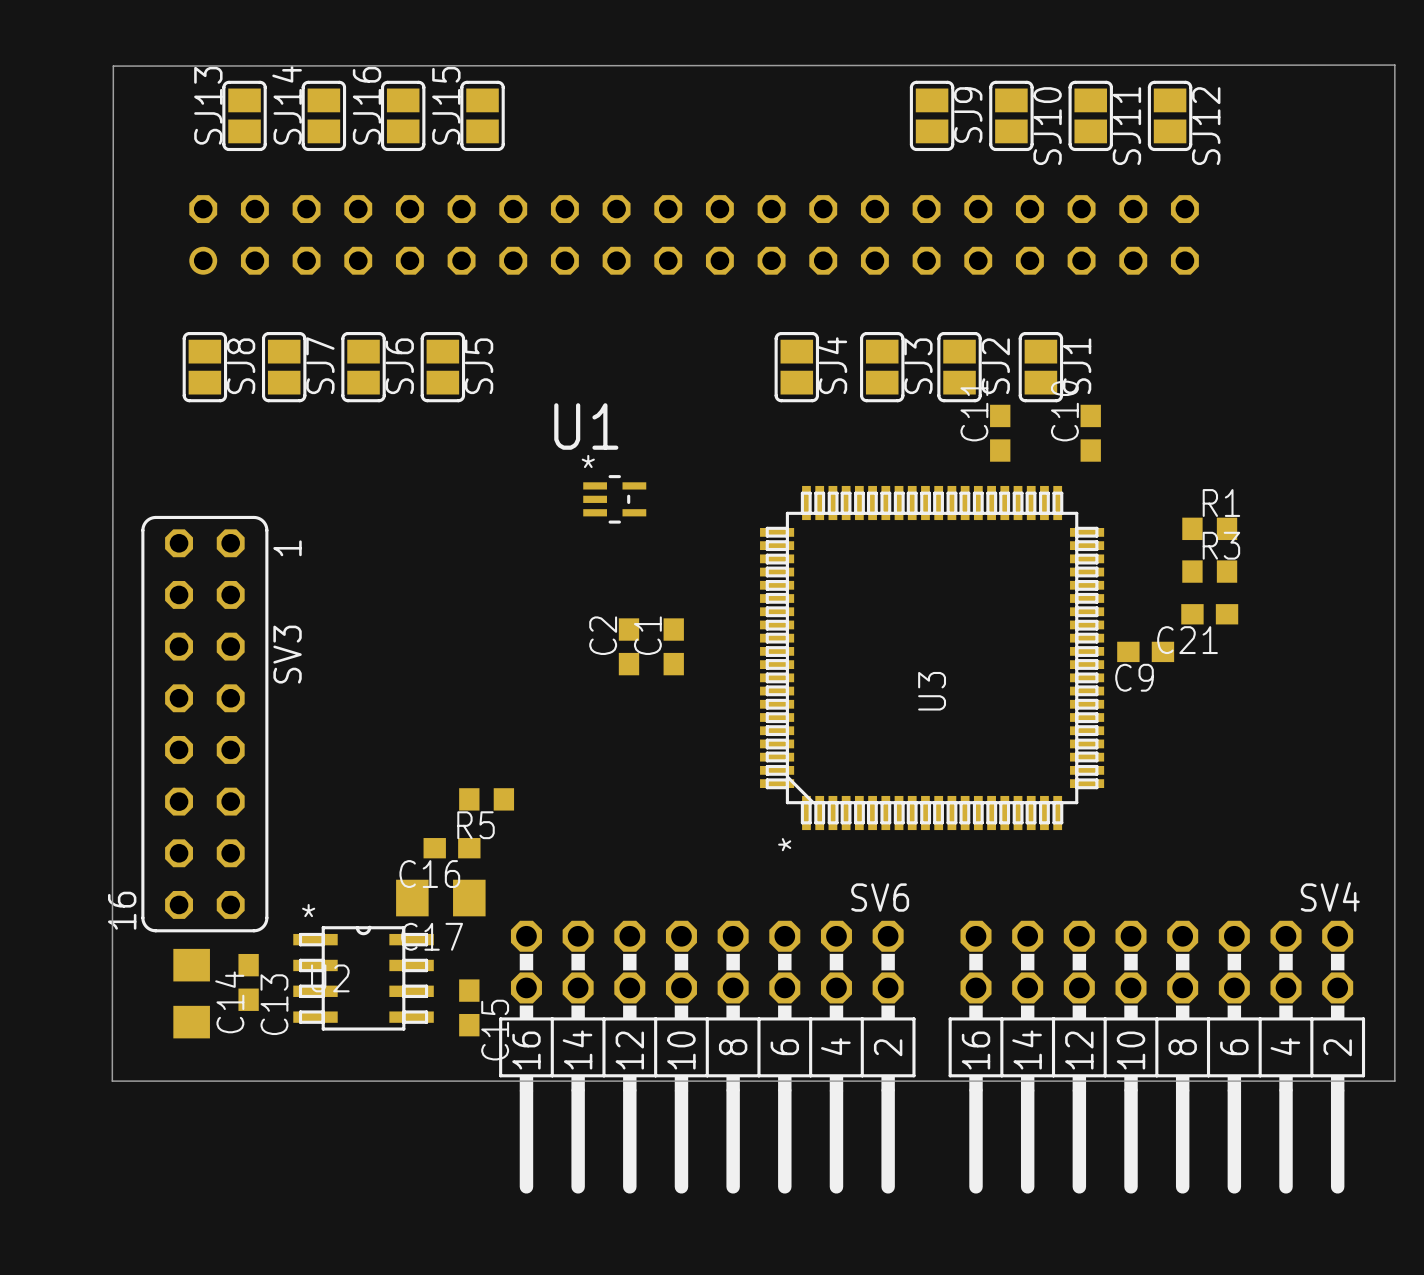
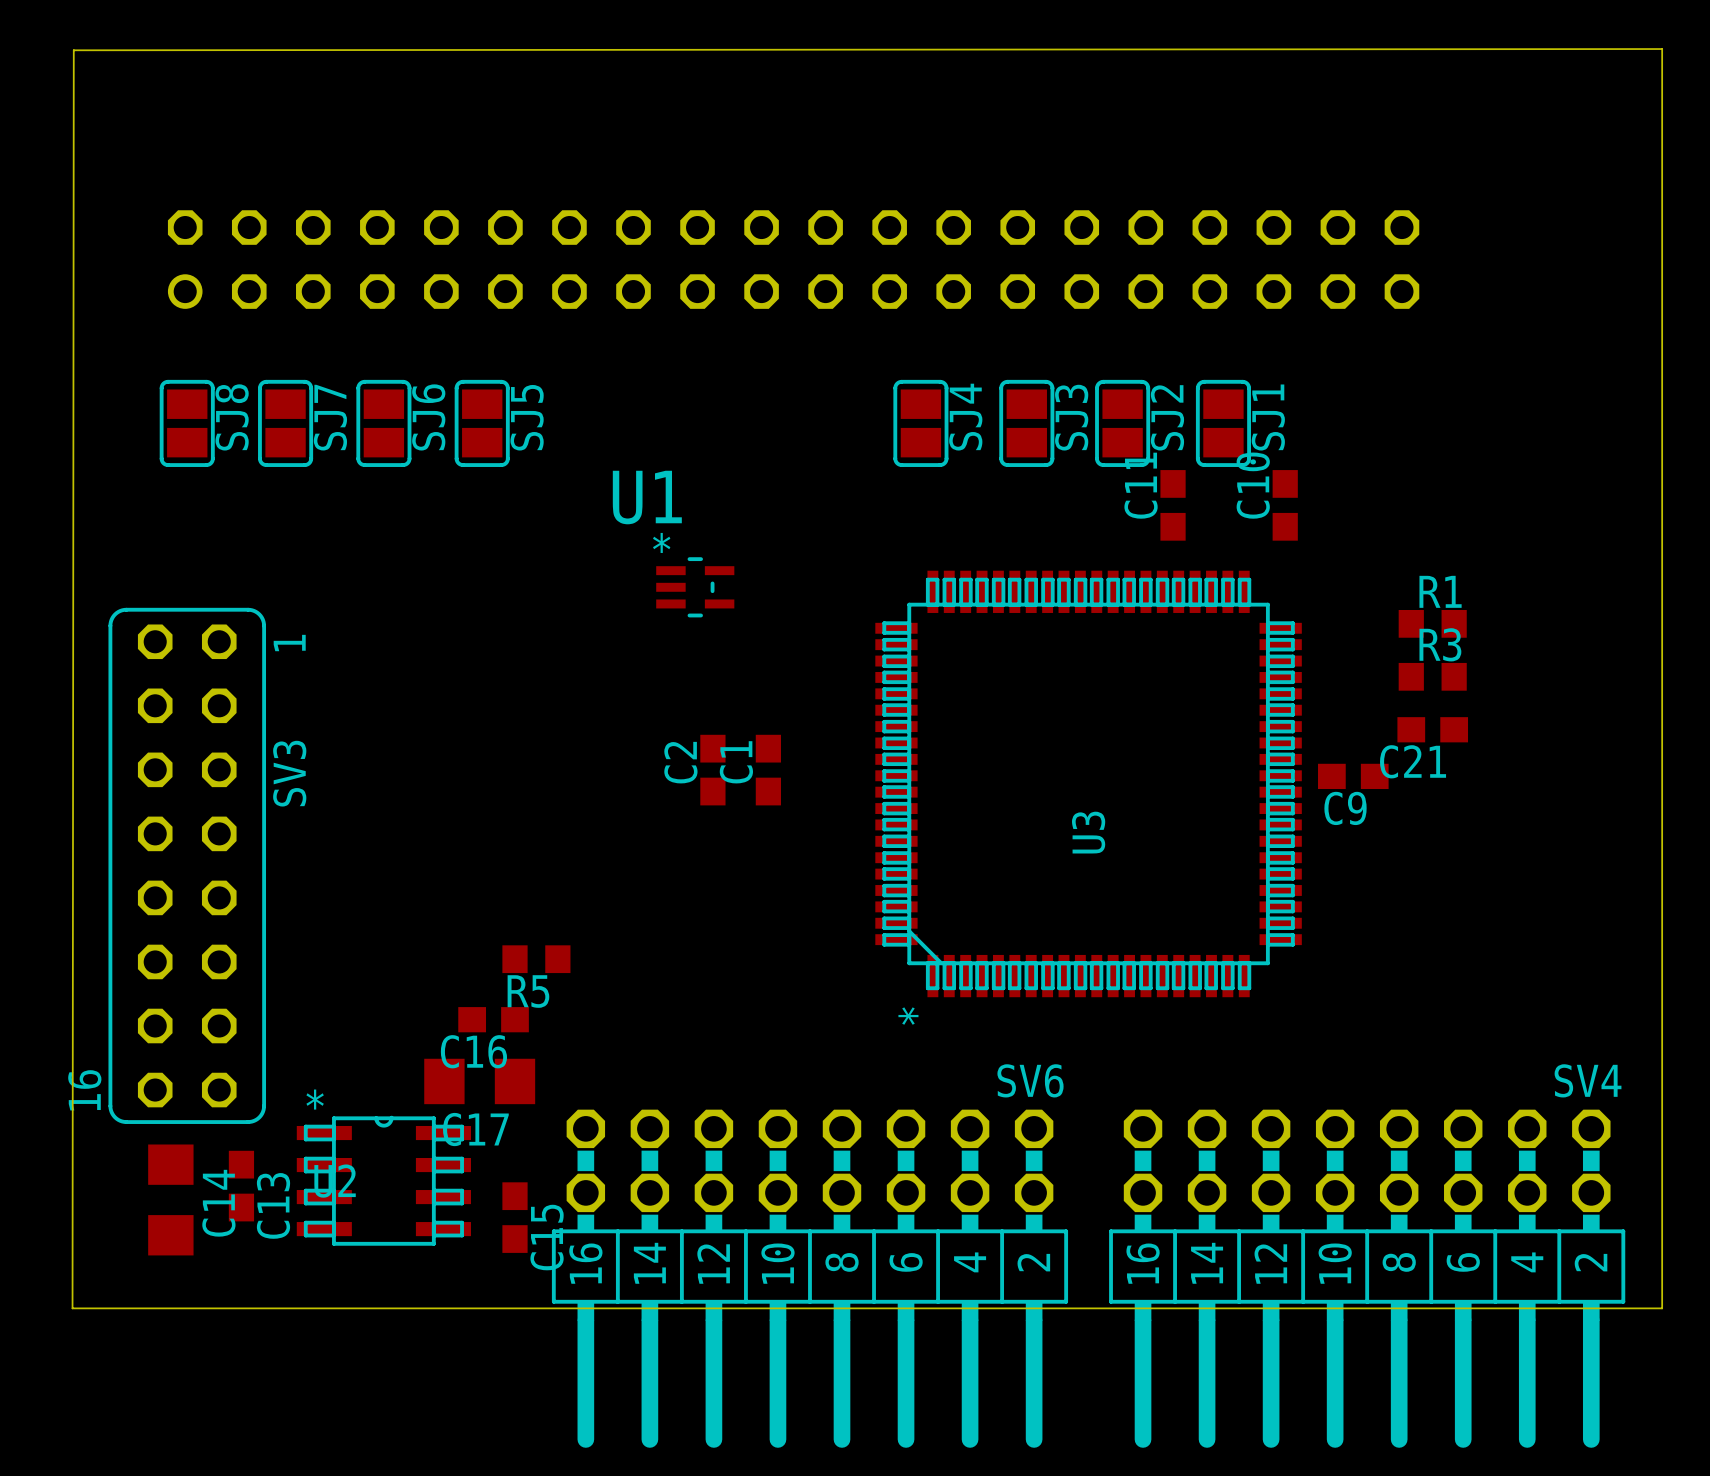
SJ13: (244, 115) -> none
SJ14: (323, 115) -> none
SJ16: (403, 115) -> none
SJ15: (482, 115) -> none
SJ9: (932, 115) -> none
SJ10: (1011, 115) -> none
SJ11: (1090, 115) -> none
SJ12: (1170, 115) -> none

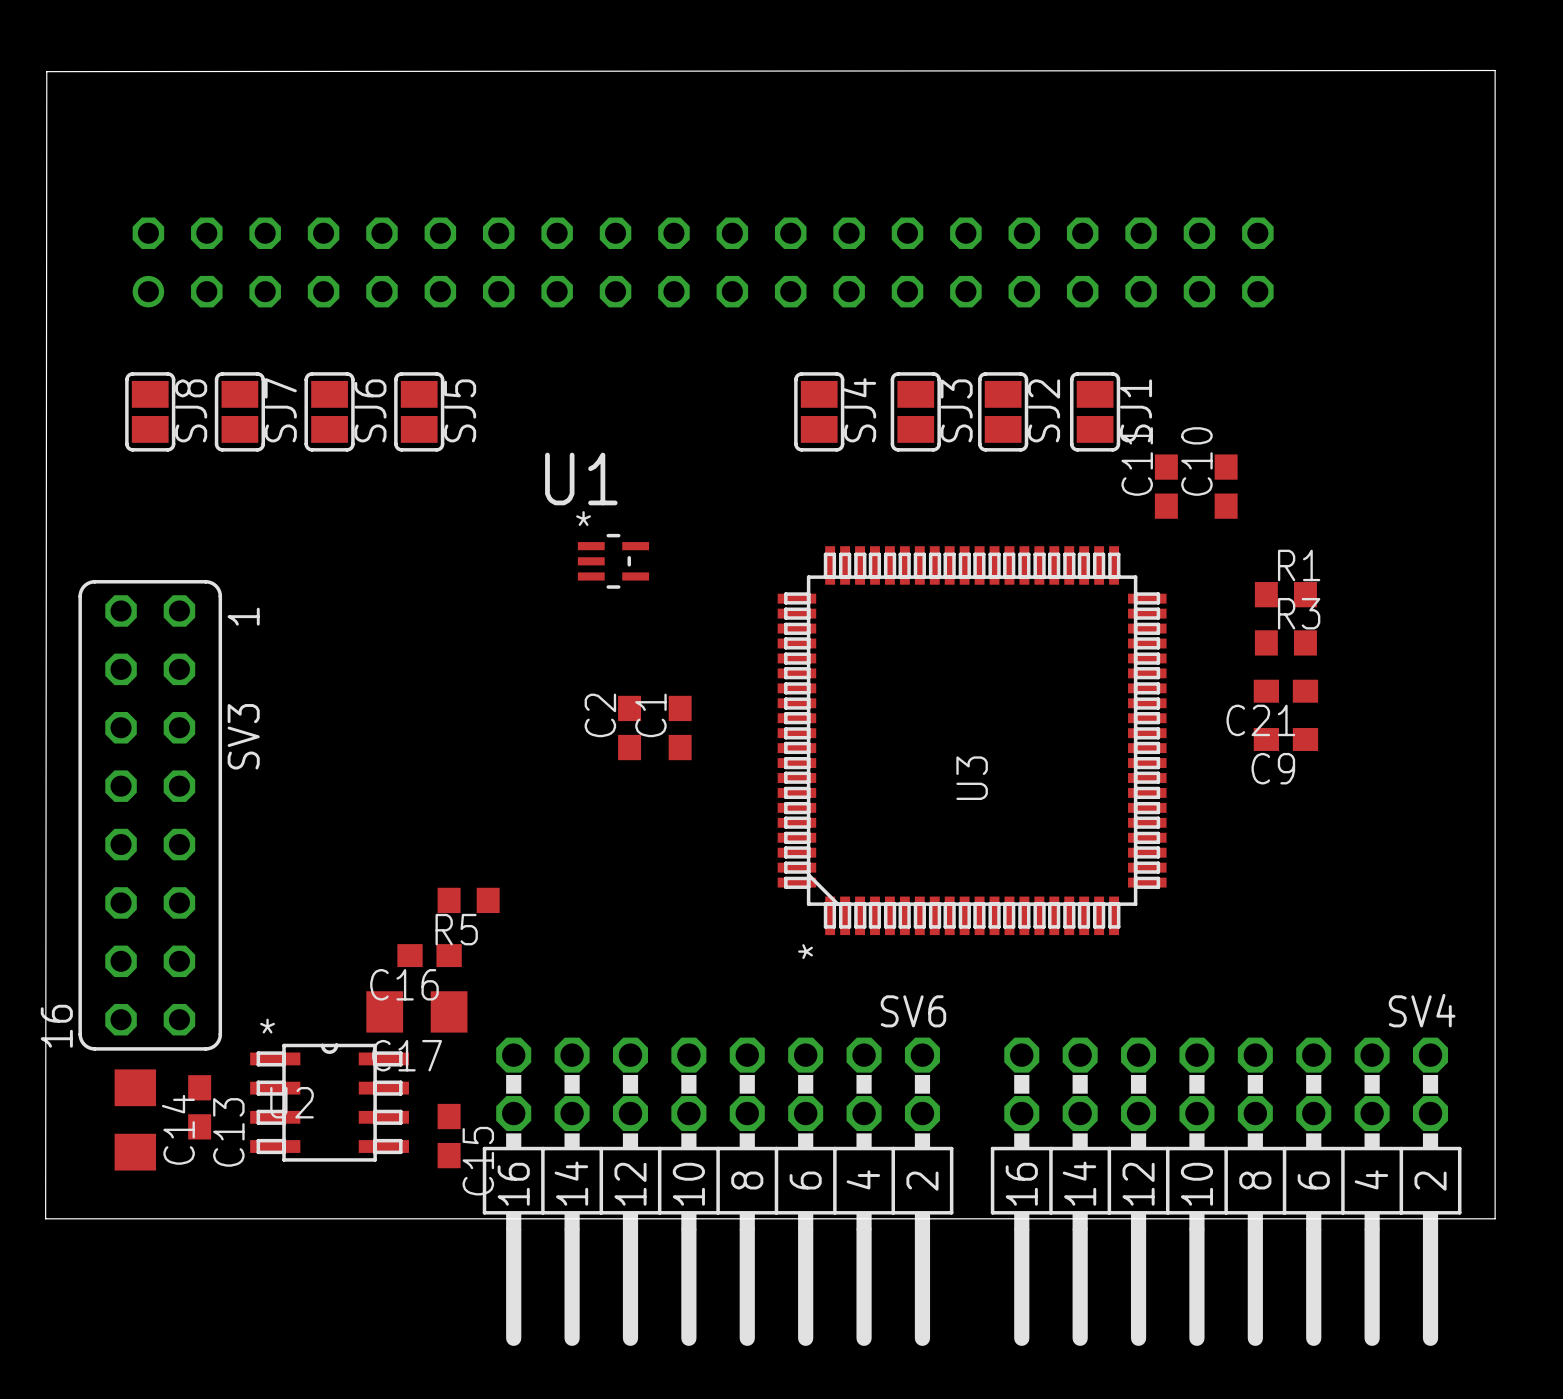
C11 position: (1173, 505) -> (1166, 486)
C10 position: (1285, 505) -> (1226, 486)
C9 position: (1353, 776) -> (1285, 739)

